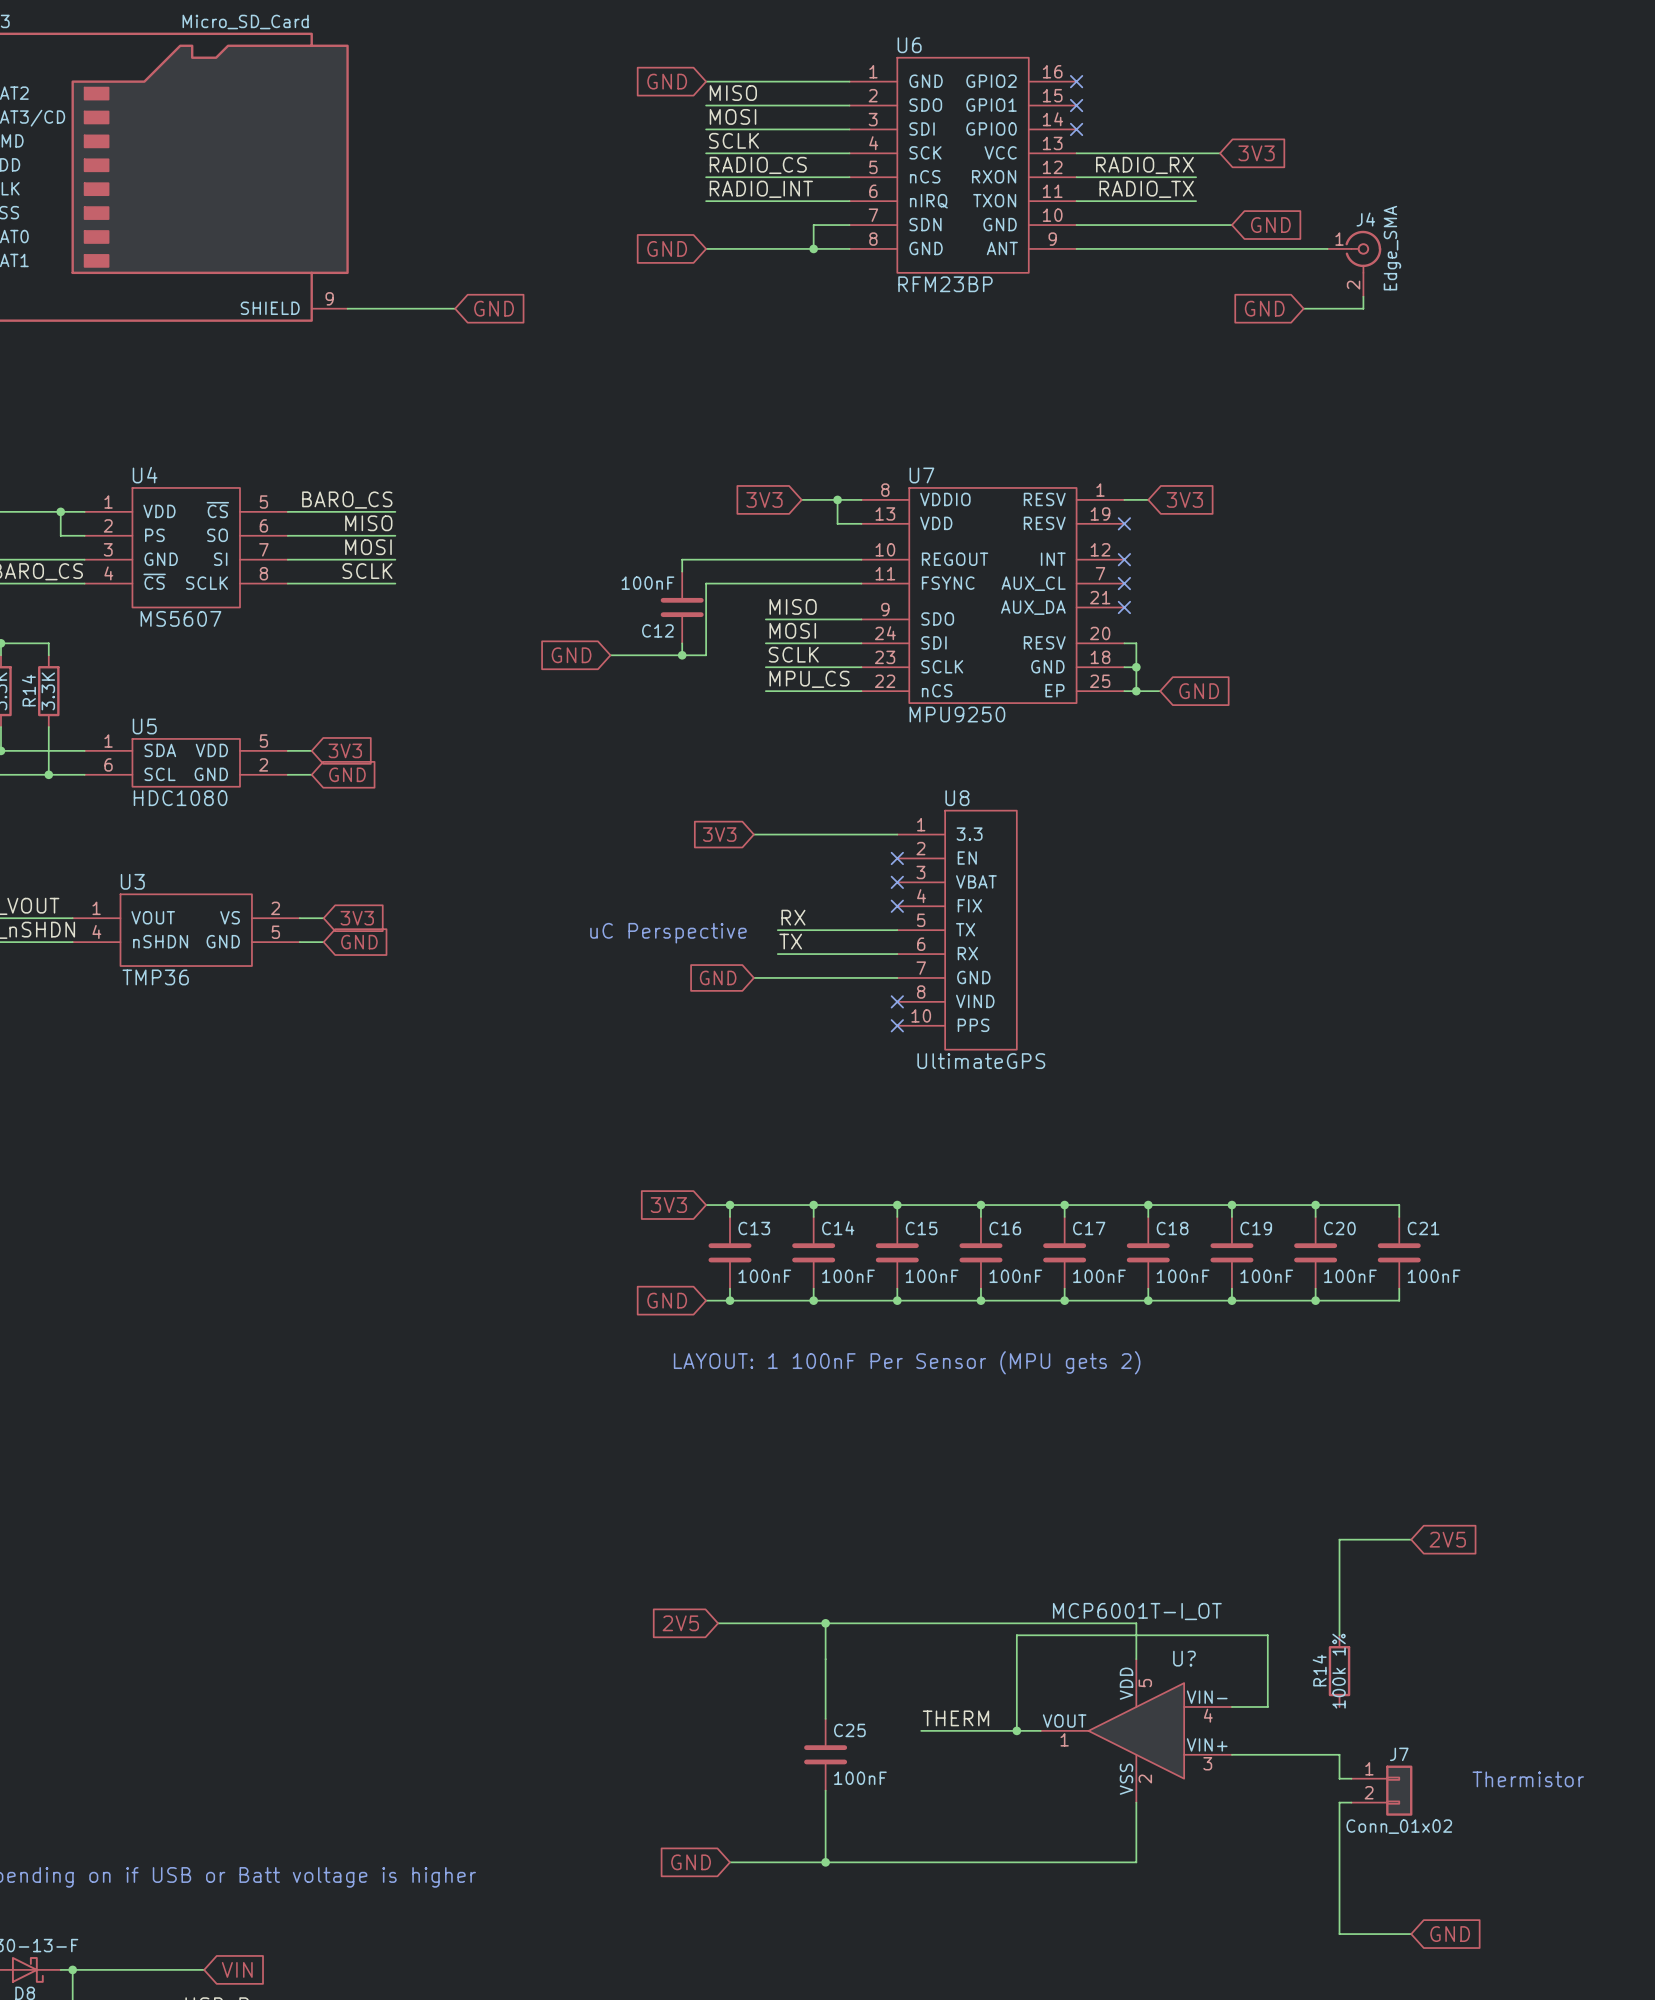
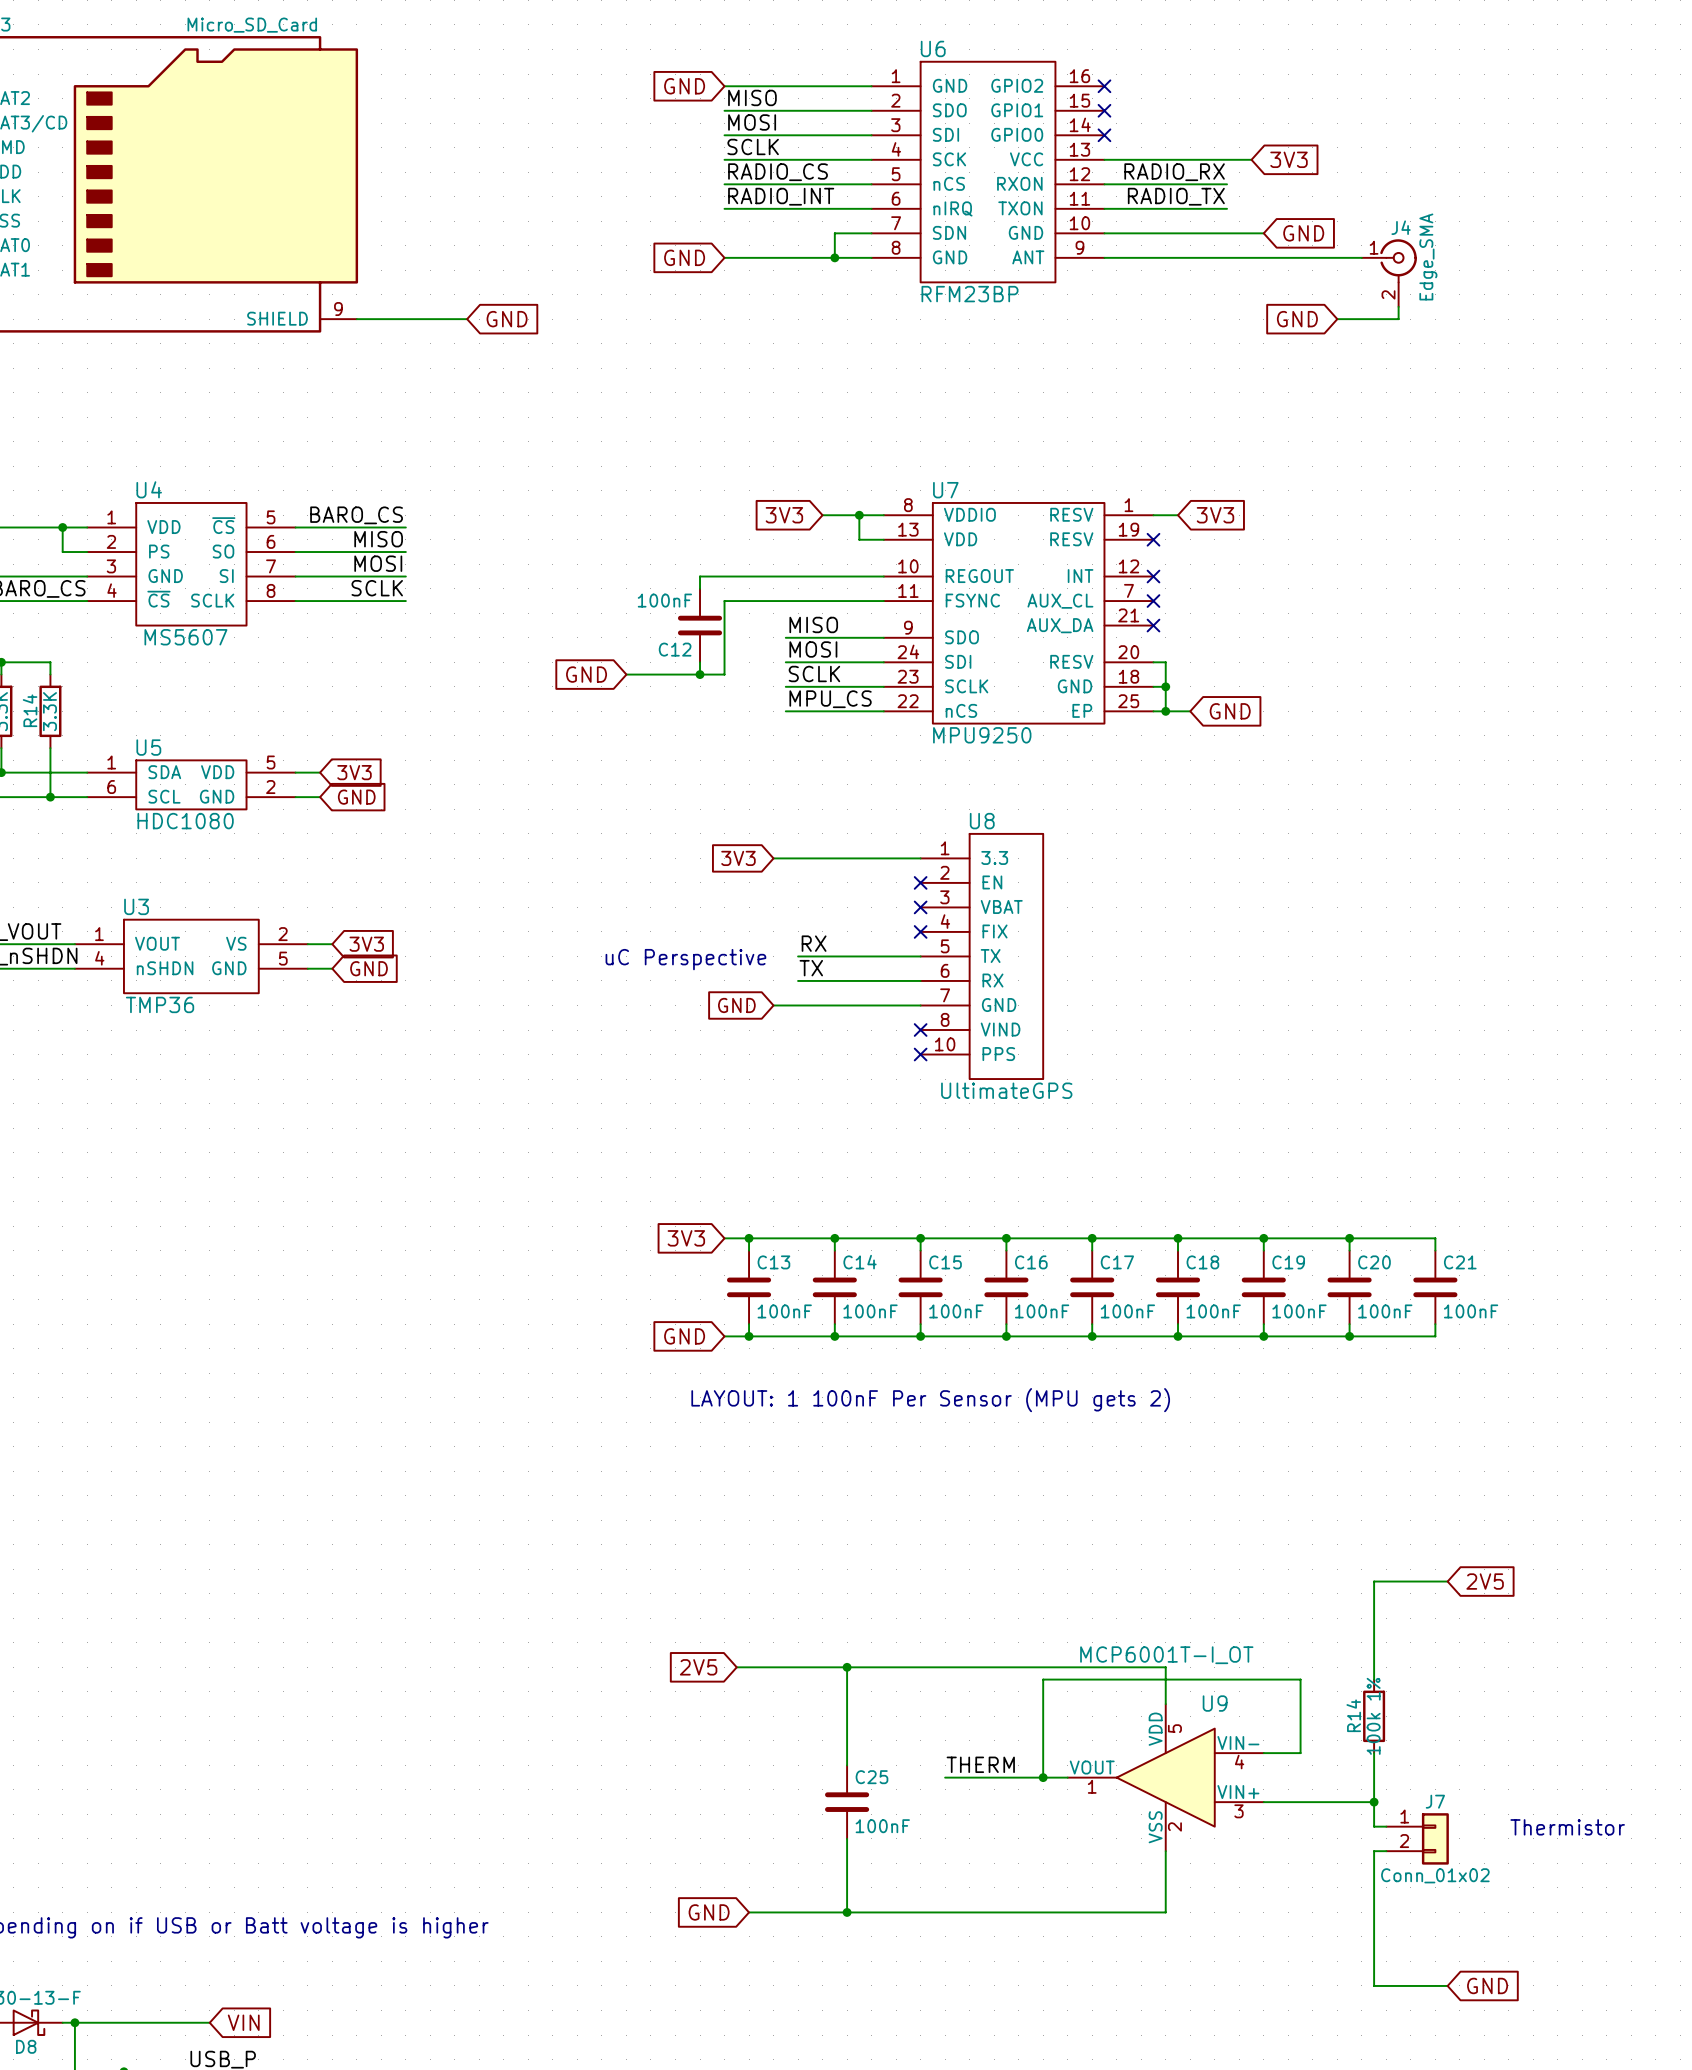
U? name: U? (1184, 1658) -> U9 (1215, 1703)
wire: none -> (1374, 1753) (1374, 1802)
junction: none -> (1374, 1802)

